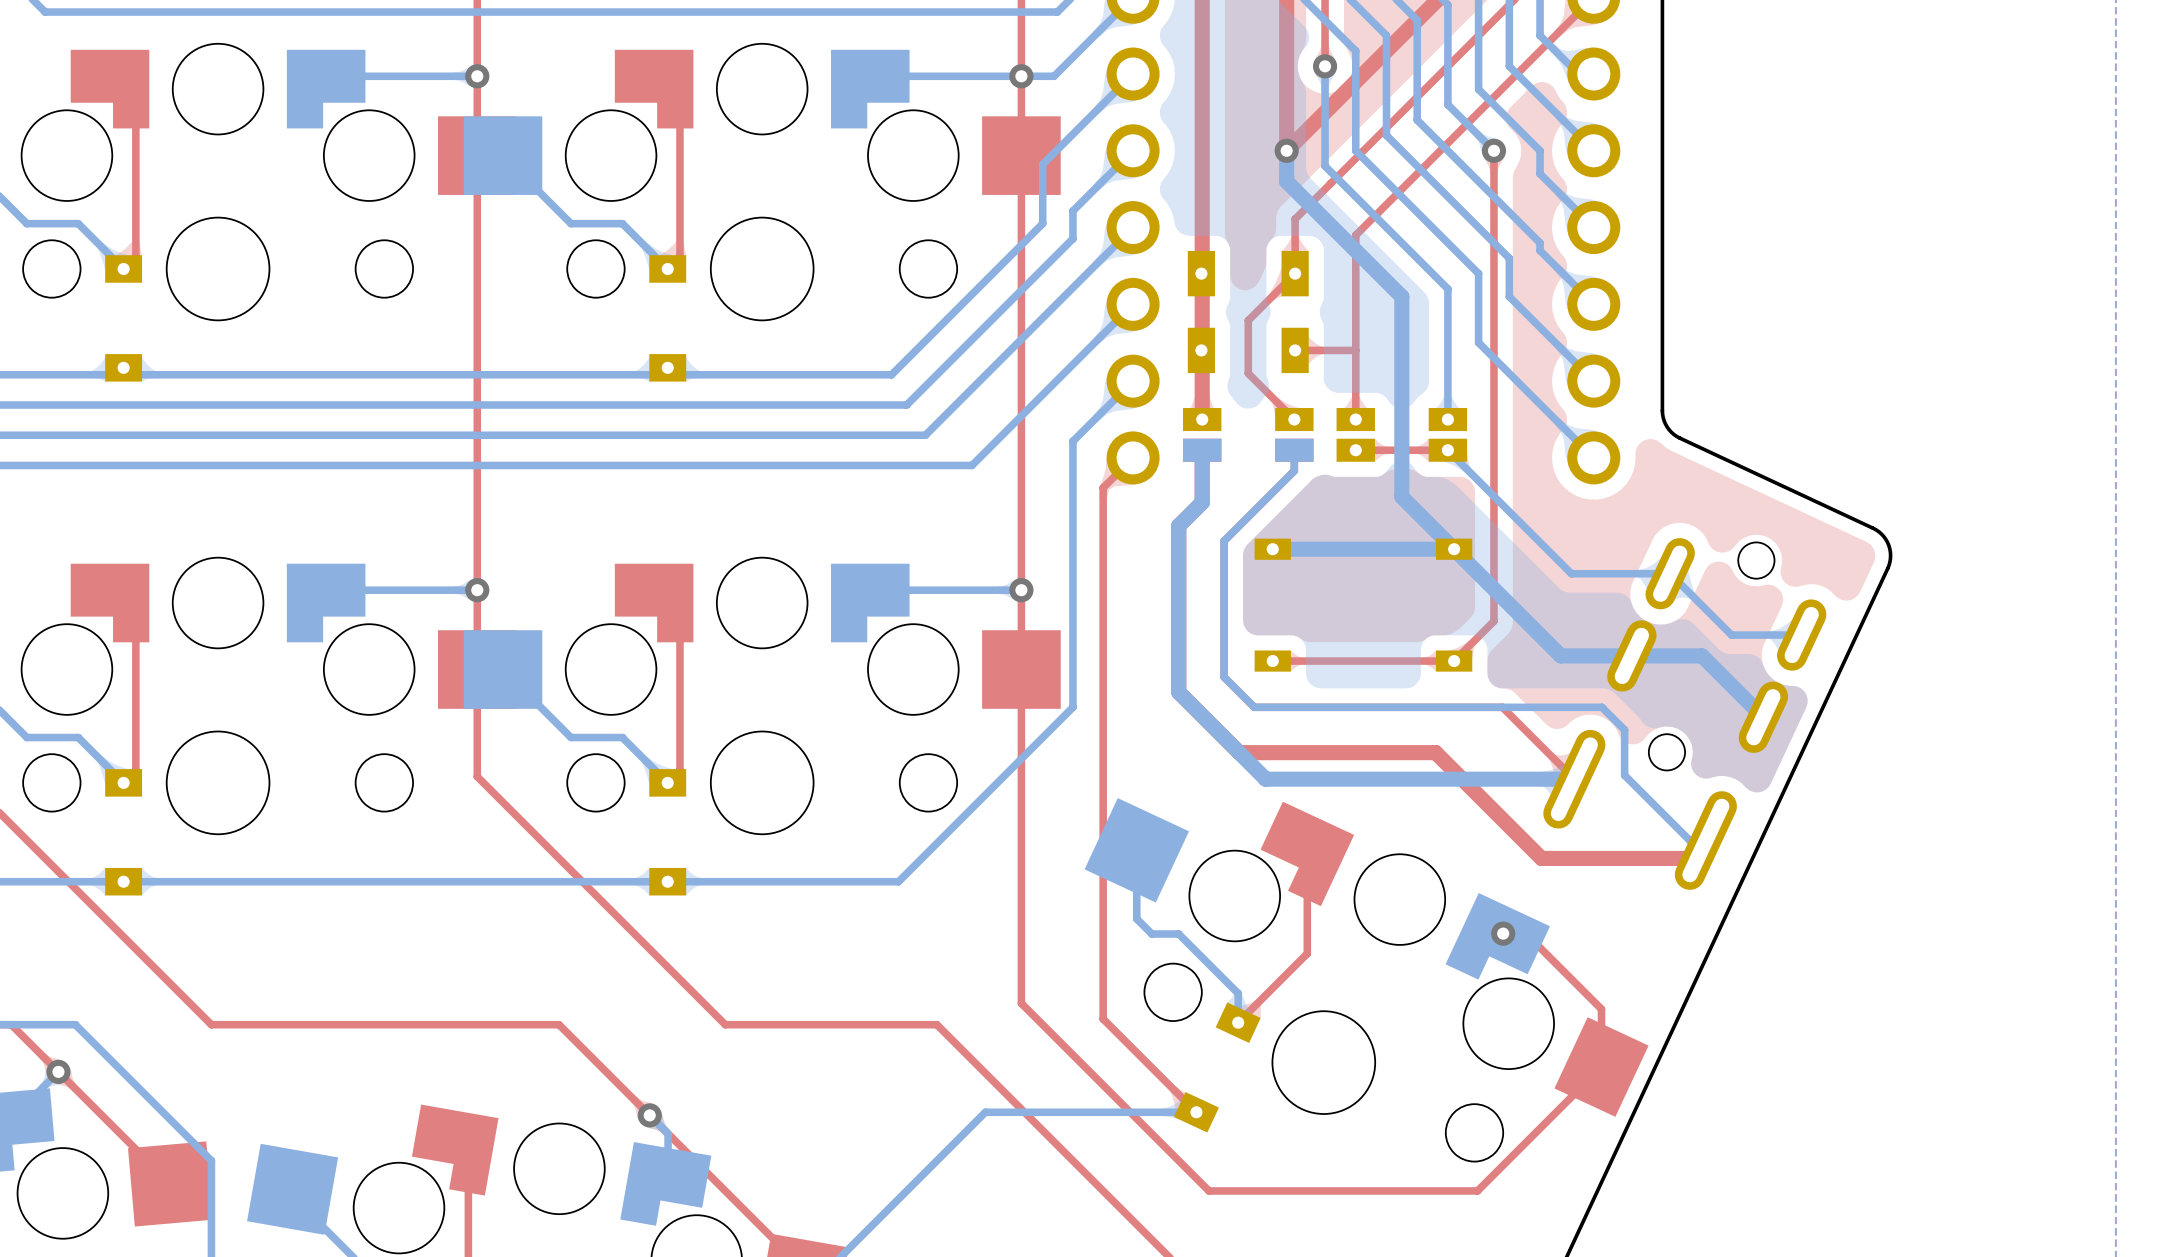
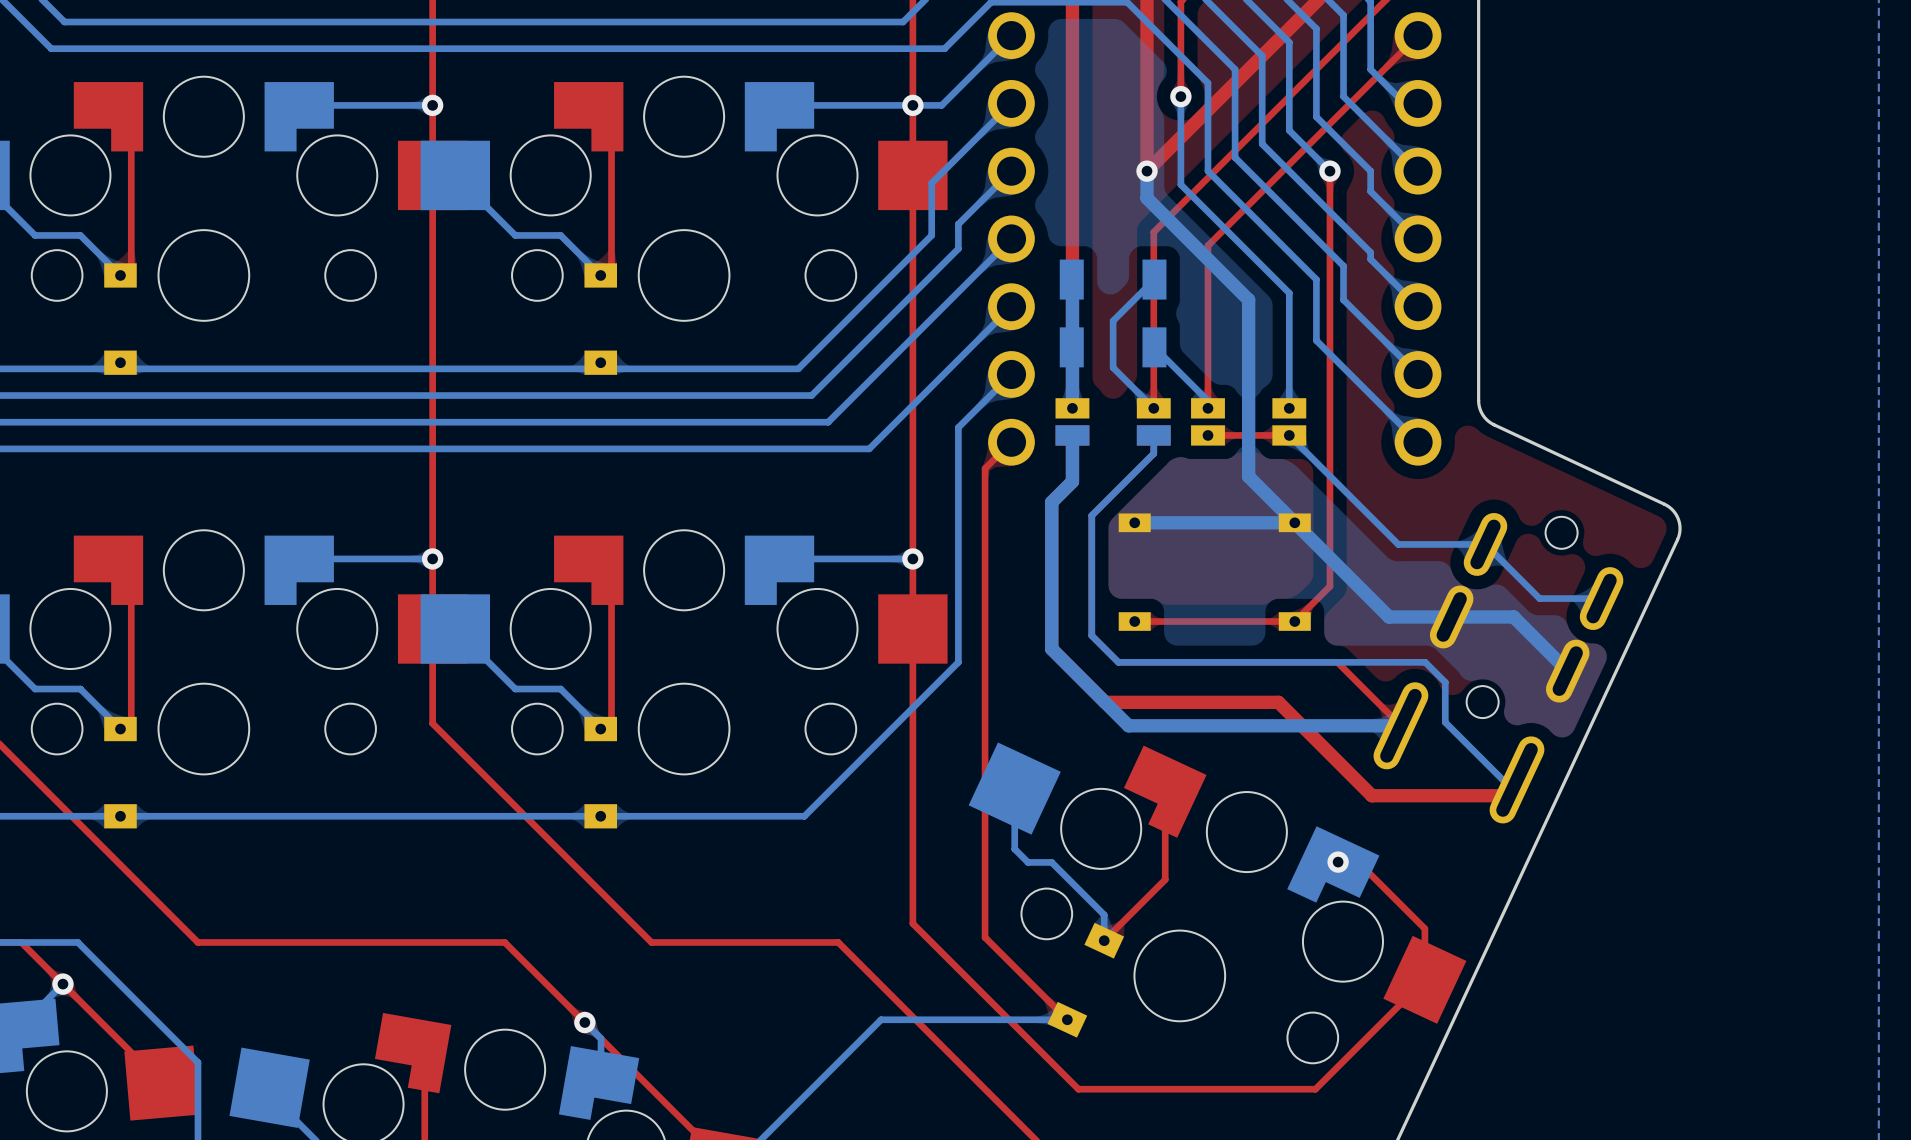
top track: (1295, 219) (1295, 273) (1248, 320) (1248, 373) (1294, 419) -> (1154, 231) (1153, 408)
part footprint: [1187, 250, 1309, 297] -> [1059, 259, 1167, 300]
bottom track: none -> (1154, 279) (1113, 320) (1113, 367) (1153, 408)
bottom track: none -> (1072, 280) (1072, 408)
part footprint: [1187, 327, 1309, 374] -> [1059, 327, 1167, 368]
bottom track: none -> (1154, 347) (1207, 400) (1207, 408)
top track: (1355, 350) (1295, 350) -> none

